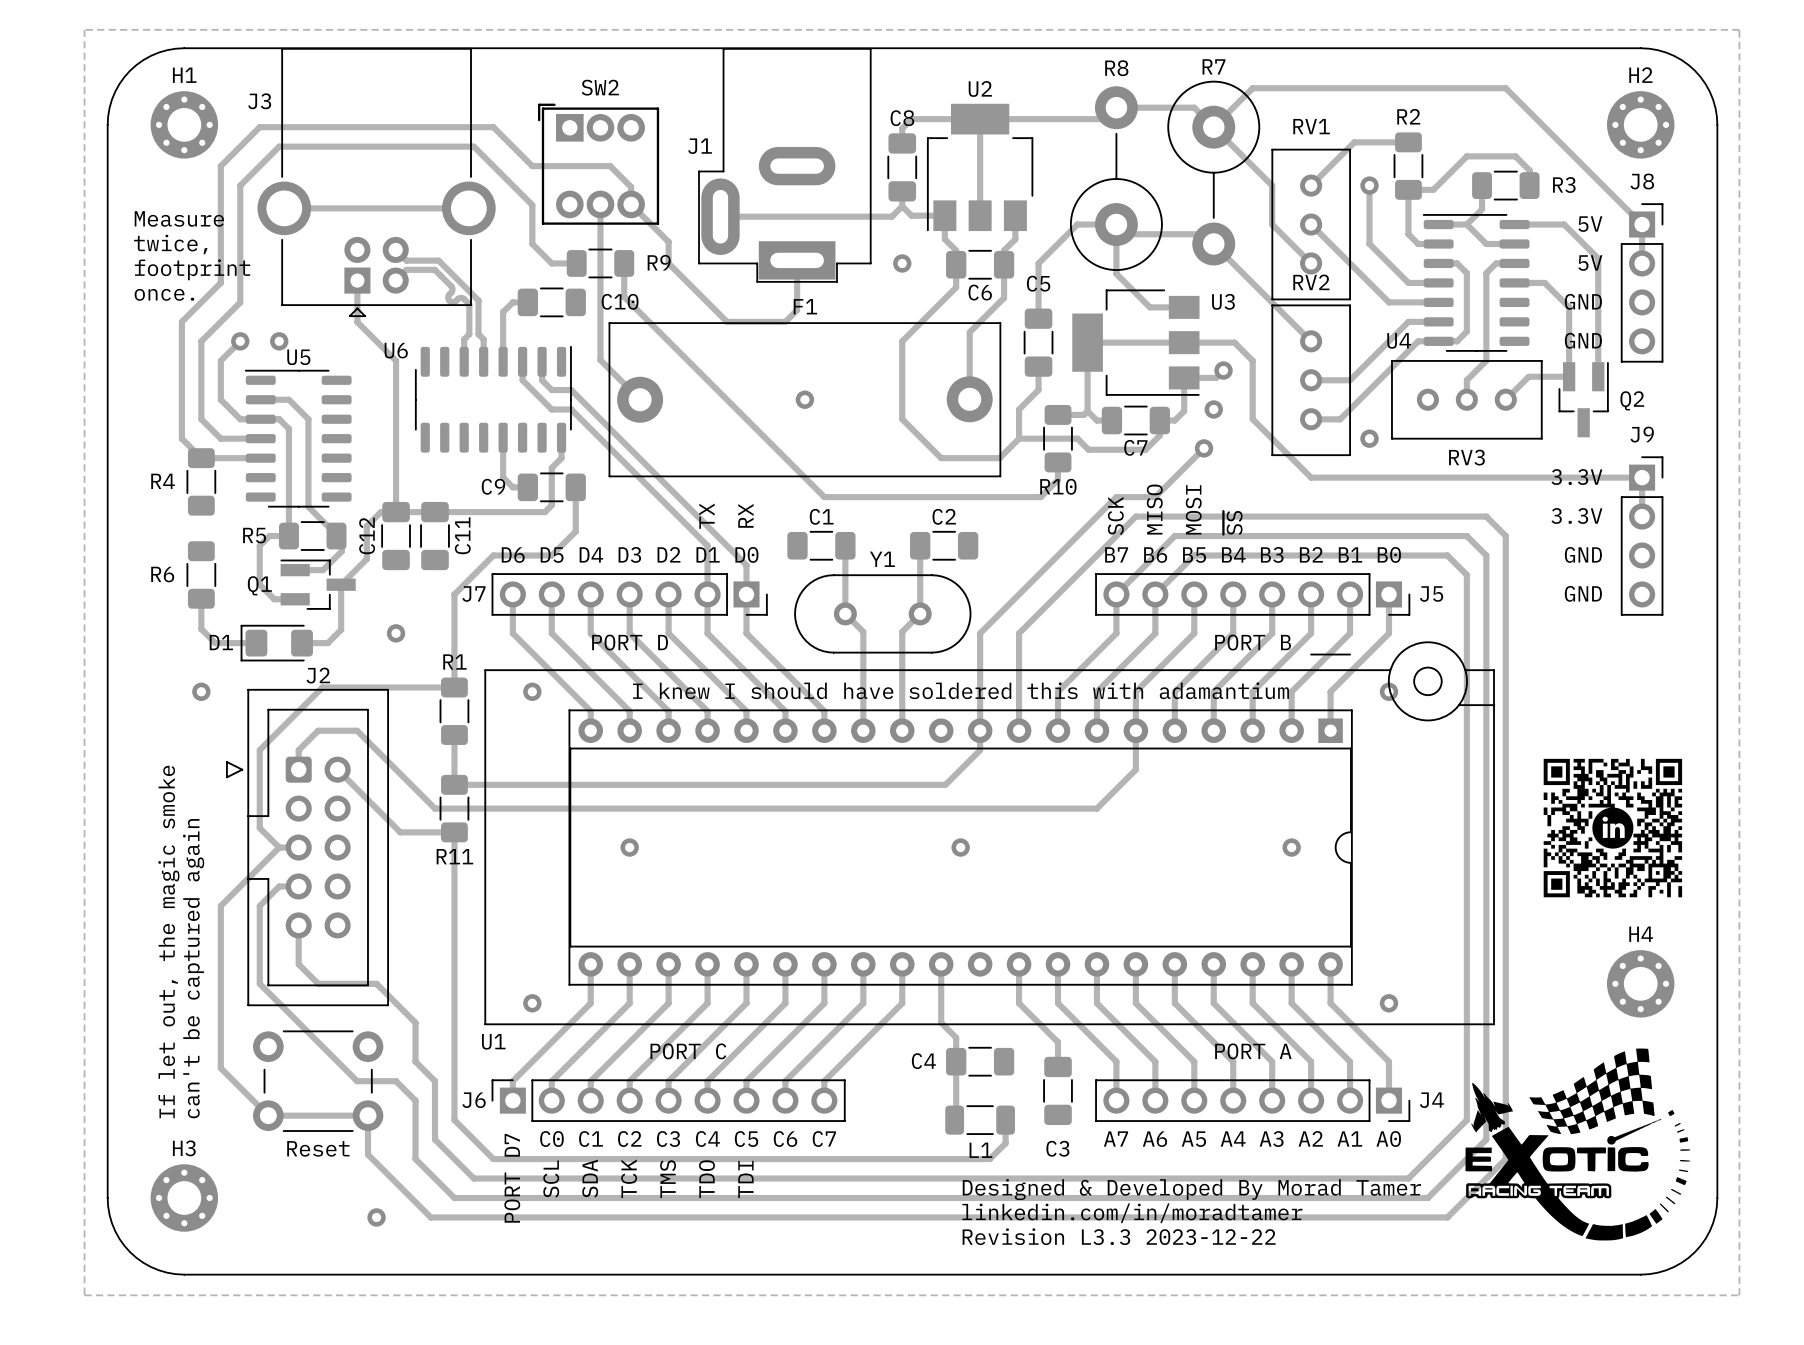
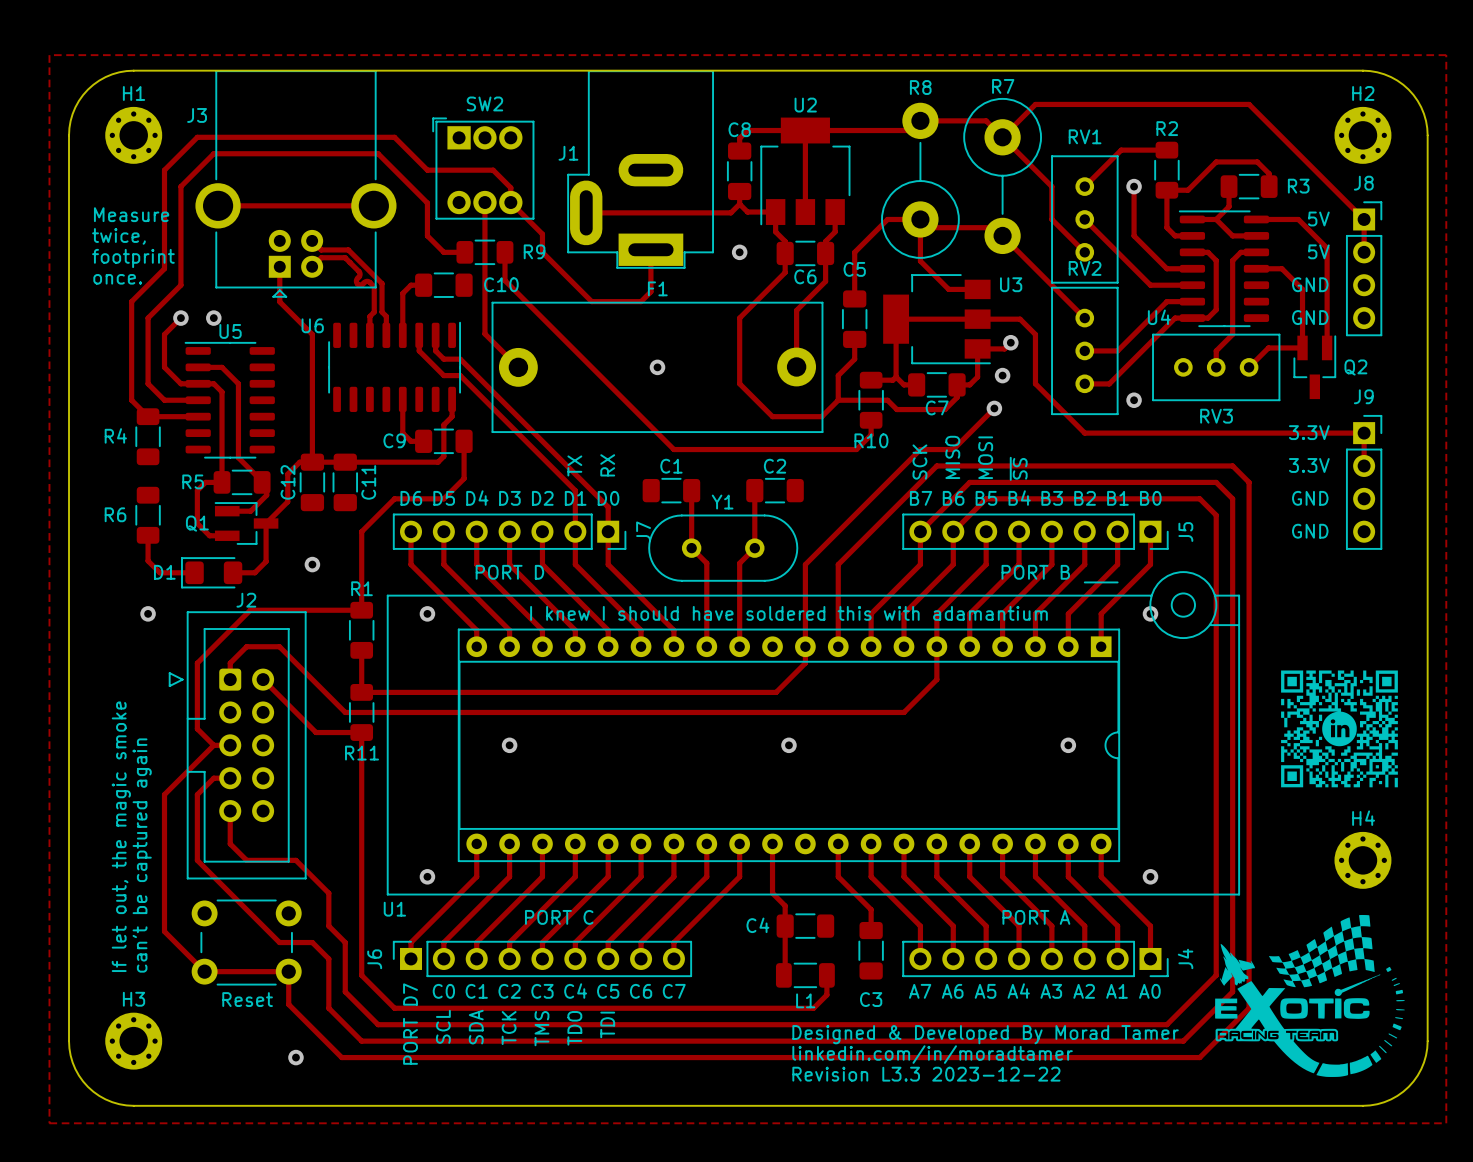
J7 name rotation: 0° (473, 594) -> 90° counterclockwise (643, 531)
J7 name position: J7 (473, 594) -> J7 (643, 531)
J5 name rotation: 0° (1431, 594) -> 90° counterclockwise (1185, 532)
J6 name rotation: 0° (474, 1100) -> 90° counterclockwise (374, 959)
J4 name rotation: 0° (1431, 1100) -> 90° counterclockwise (1185, 958)

